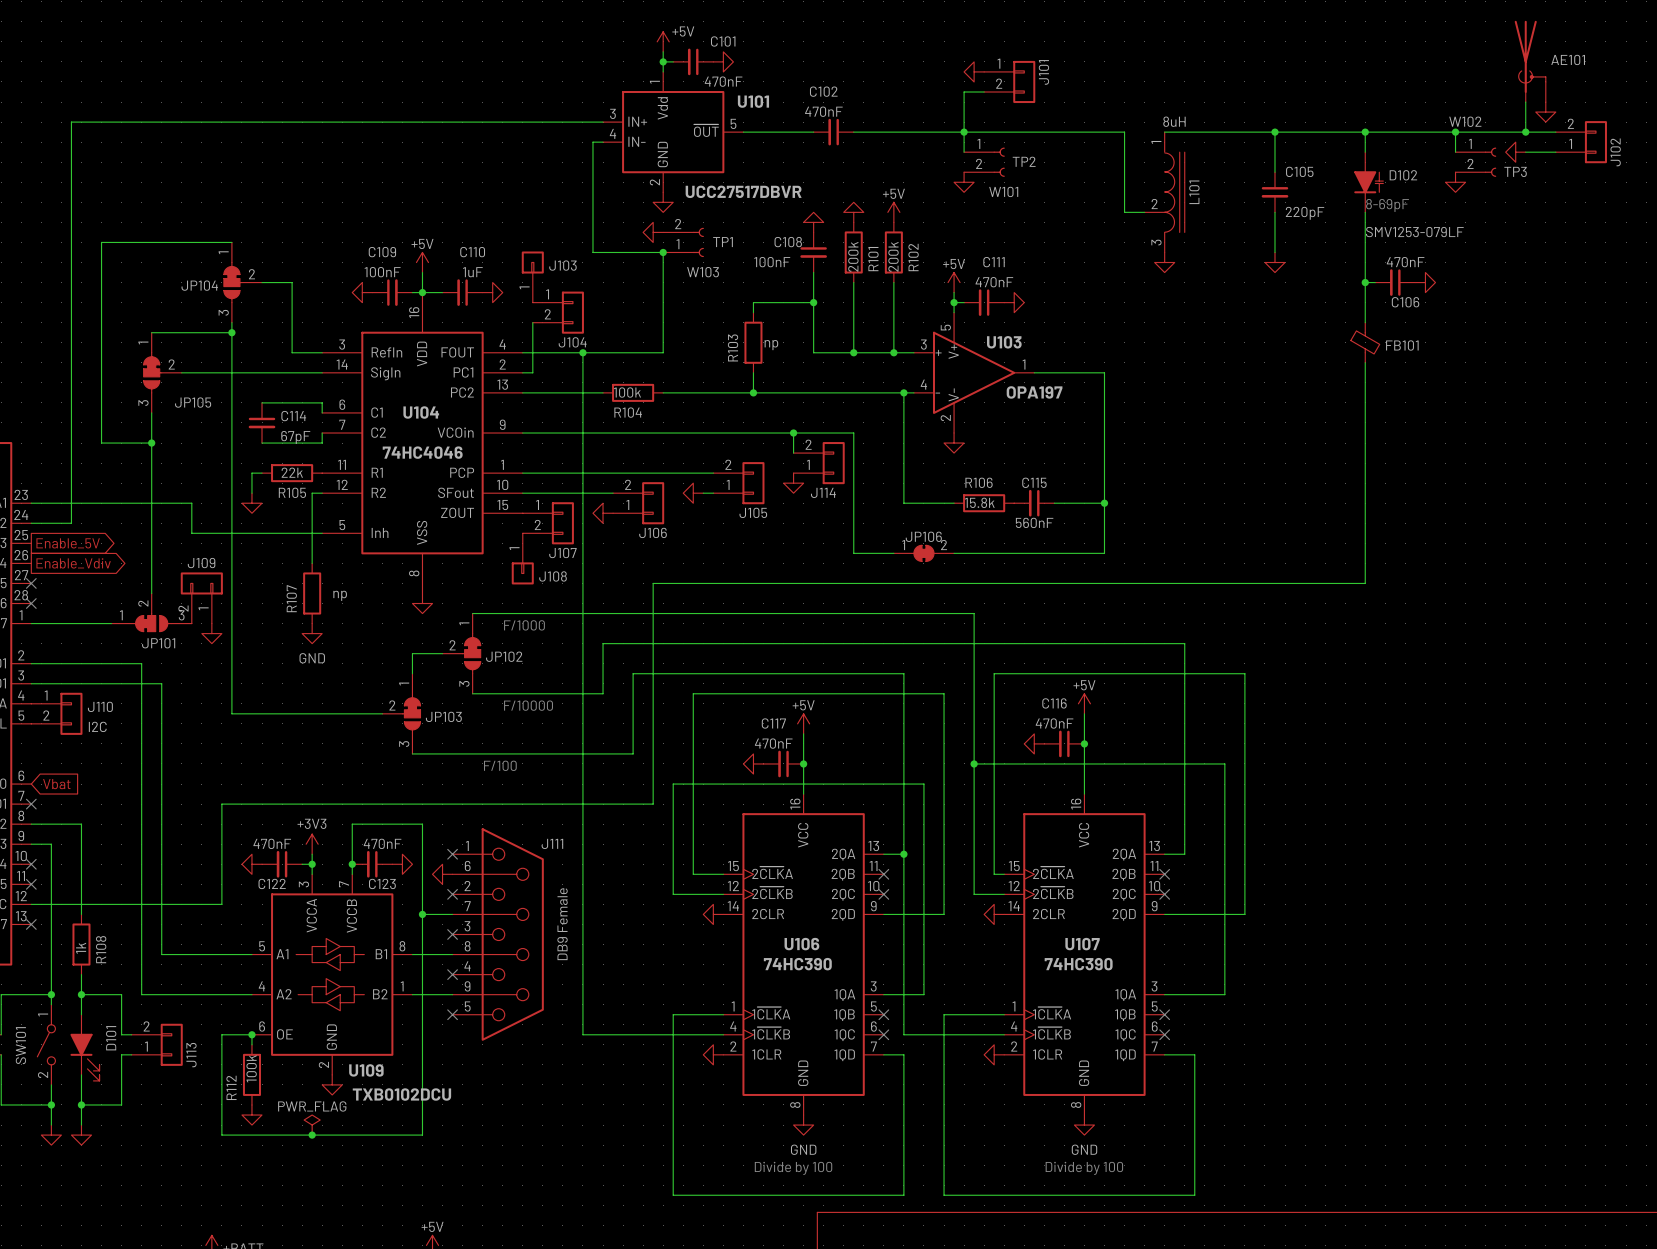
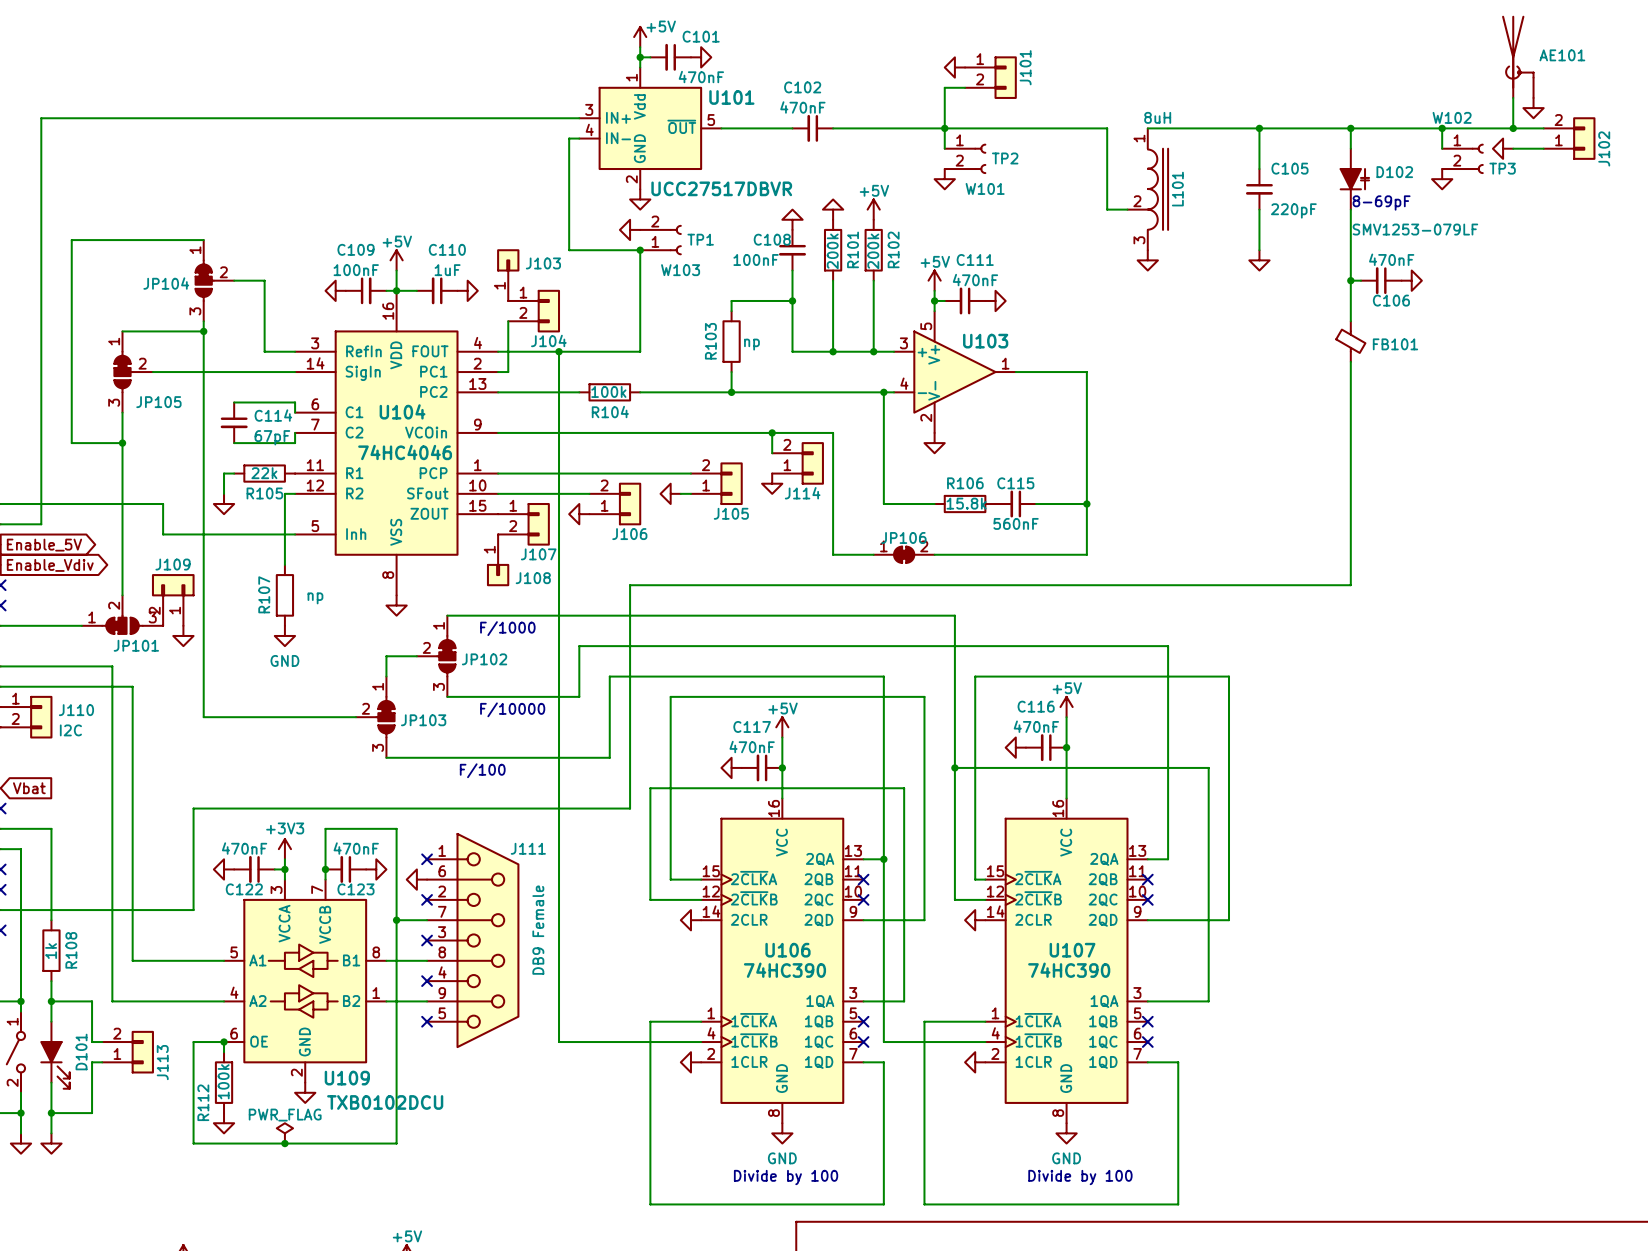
U103 value: OPA197 (1034, 392) -> none

